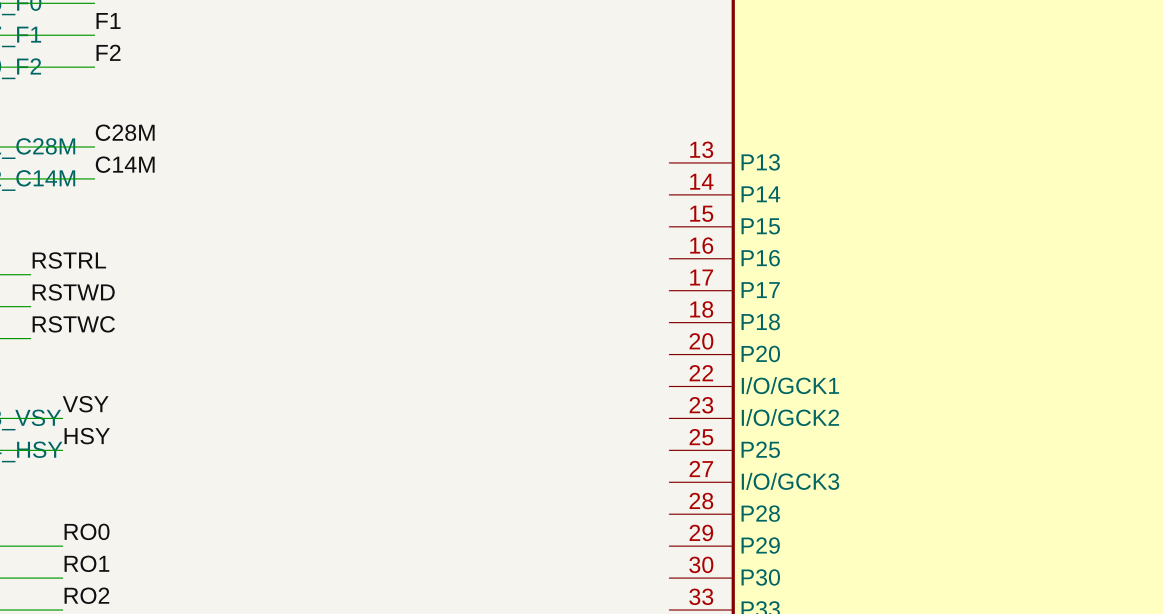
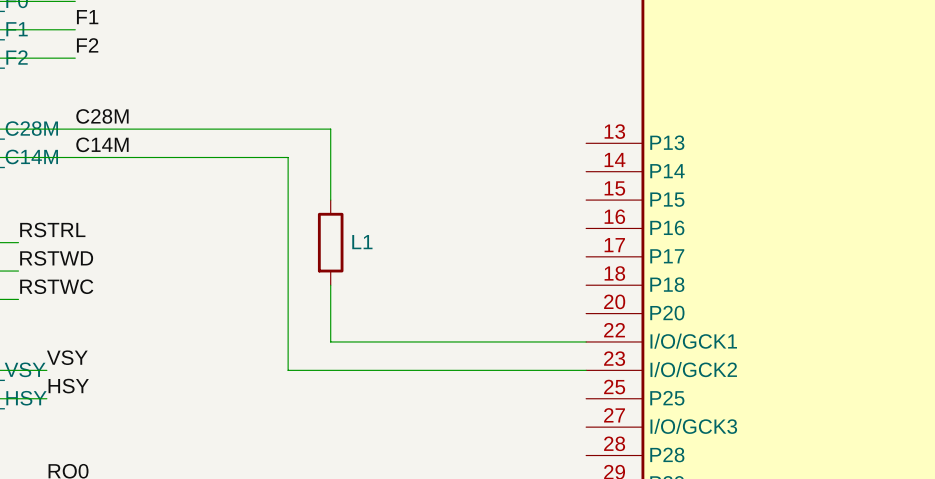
wire: none -> (75, 129) (330, 129) (330, 200)
wire: none -> (75, 157) (288, 157) (288, 370) (586, 370)
L1: none -> (330, 242)
wire: none -> (330, 285) (330, 341) (586, 341)

